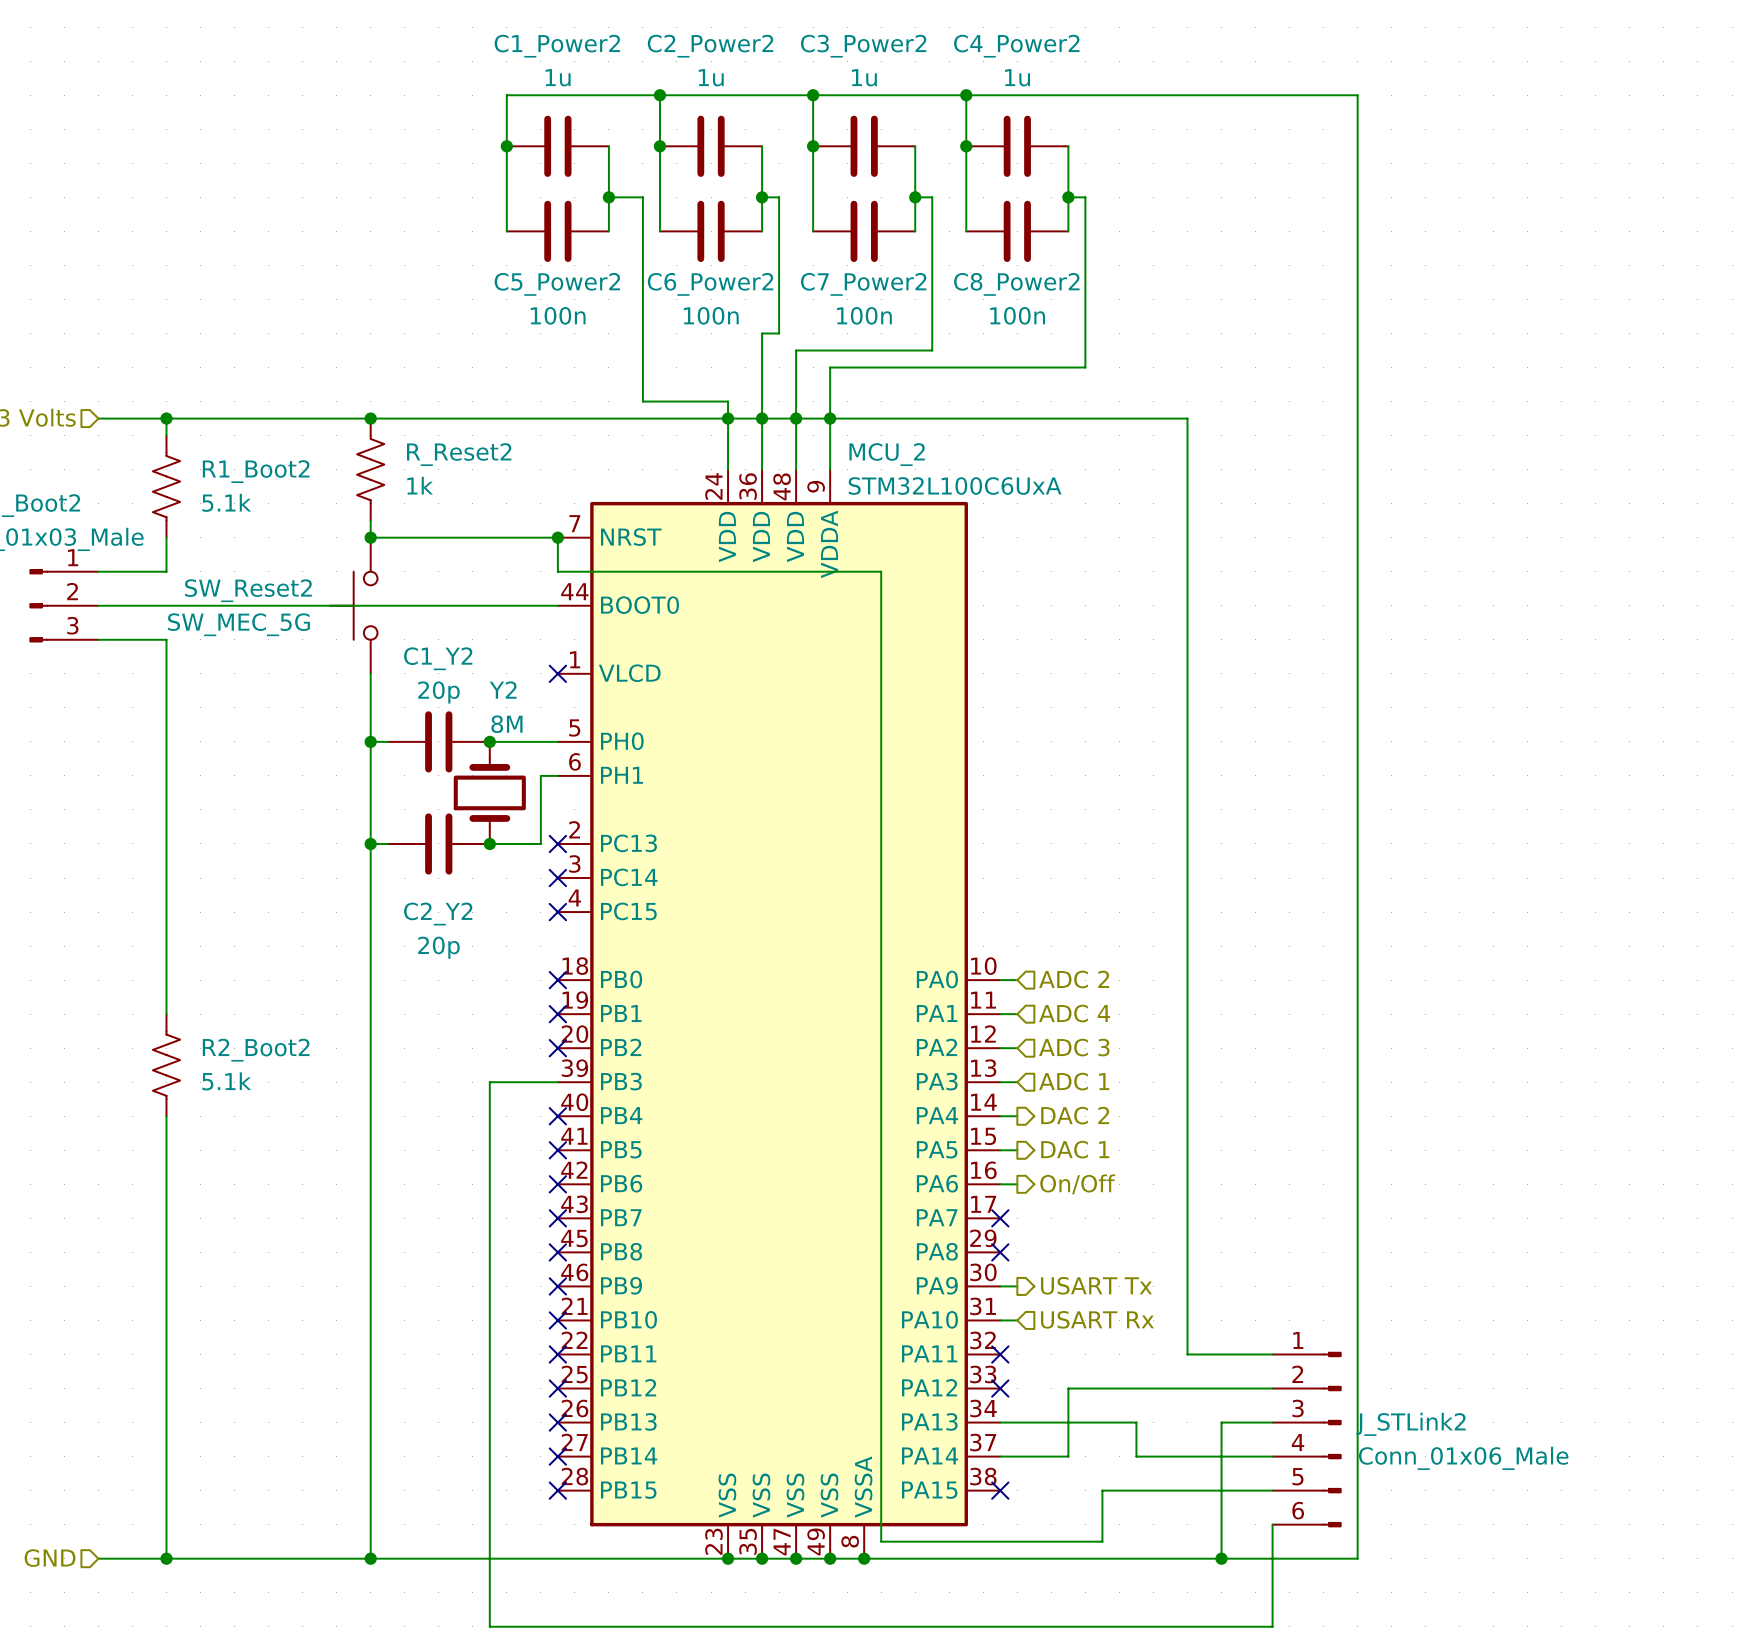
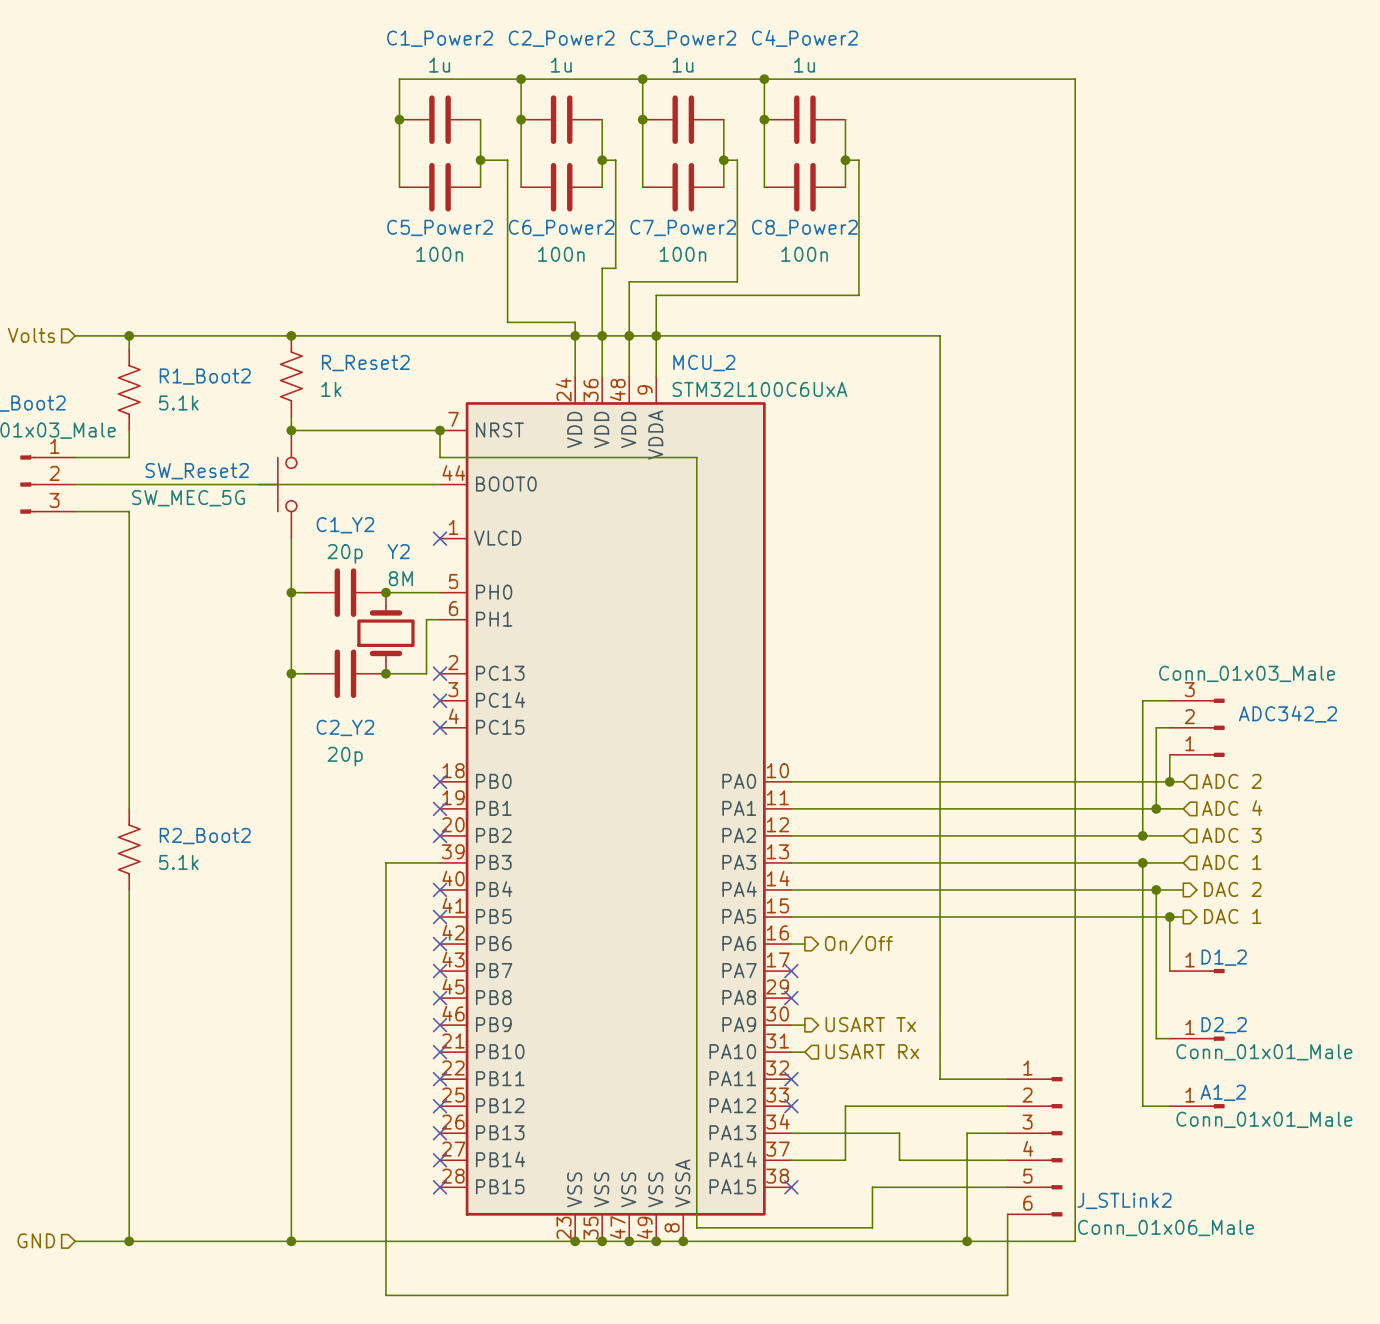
wire: none -> (1169, 700) (1142, 700) (1142, 835)
wire: none -> (1169, 727) (1156, 727) (1156, 808)
ADC342_2: none -> Conn_01x03_Male (1197, 727)
wire: none -> (1169, 754) (1169, 781)
hierarchical label: ADC 2 (1074, 979) -> none
hierarchical label: none -> ADC 2 (1231, 781)
wire: none -> (804, 781) (1183, 781)
junction: none -> (1169, 781)
hierarchical label: ADC 4 (1074, 1013) -> none
hierarchical label: none -> ADC 4 (1232, 808)
wire: none -> (804, 808) (1183, 808)
junction: none -> (1156, 808)
hierarchical label: ADC 3 (1074, 1047) -> none
hierarchical label: none -> ADC 3 (1231, 835)
wire: none -> (804, 835) (1183, 835)
junction: none -> (1142, 835)
hierarchical label: ADC 1 (1074, 1081) -> none
hierarchical label: none -> ADC 1 (1231, 862)
wire: none -> (804, 862) (1183, 862)
wire: none -> (1142, 862) (1142, 1106) (1169, 1106)
junction: none -> (1142, 862)
hierarchical label: DAC 2 (1075, 1115) -> none
hierarchical label: none -> DAC 2 (1232, 889)
wire: none -> (804, 889) (1183, 889)
wire: none -> (1156, 889) (1156, 1038) (1169, 1038)
junction: none -> (1156, 889)
hierarchical label: DAC 1 (1075, 1149) -> none
hierarchical label: none -> DAC 1 (1232, 916)
wire: none -> (804, 917) (1183, 917)
wire: none -> (1169, 917) (1169, 971)
junction: none -> (1169, 917)
D1_2: none -> (1197, 971)
D2_2: none -> Conn_01x01_Male (1197, 1038)
A1_2: none -> Conn_01x01_Male (1197, 1106)
J_STLink2 name position: J_STLink2 (1411, 1424) -> J_STLink2 (1124, 1200)
J_STLink2 value position: Conn_01x06_Male (1463, 1458) -> Conn_01x06_Male (1166, 1227)

